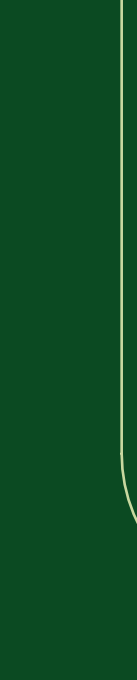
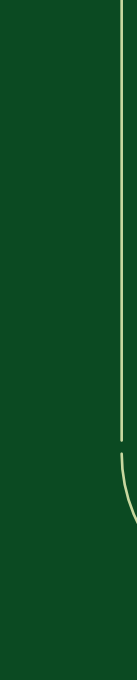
board edge: (121, 440) (121, 453) -> none

